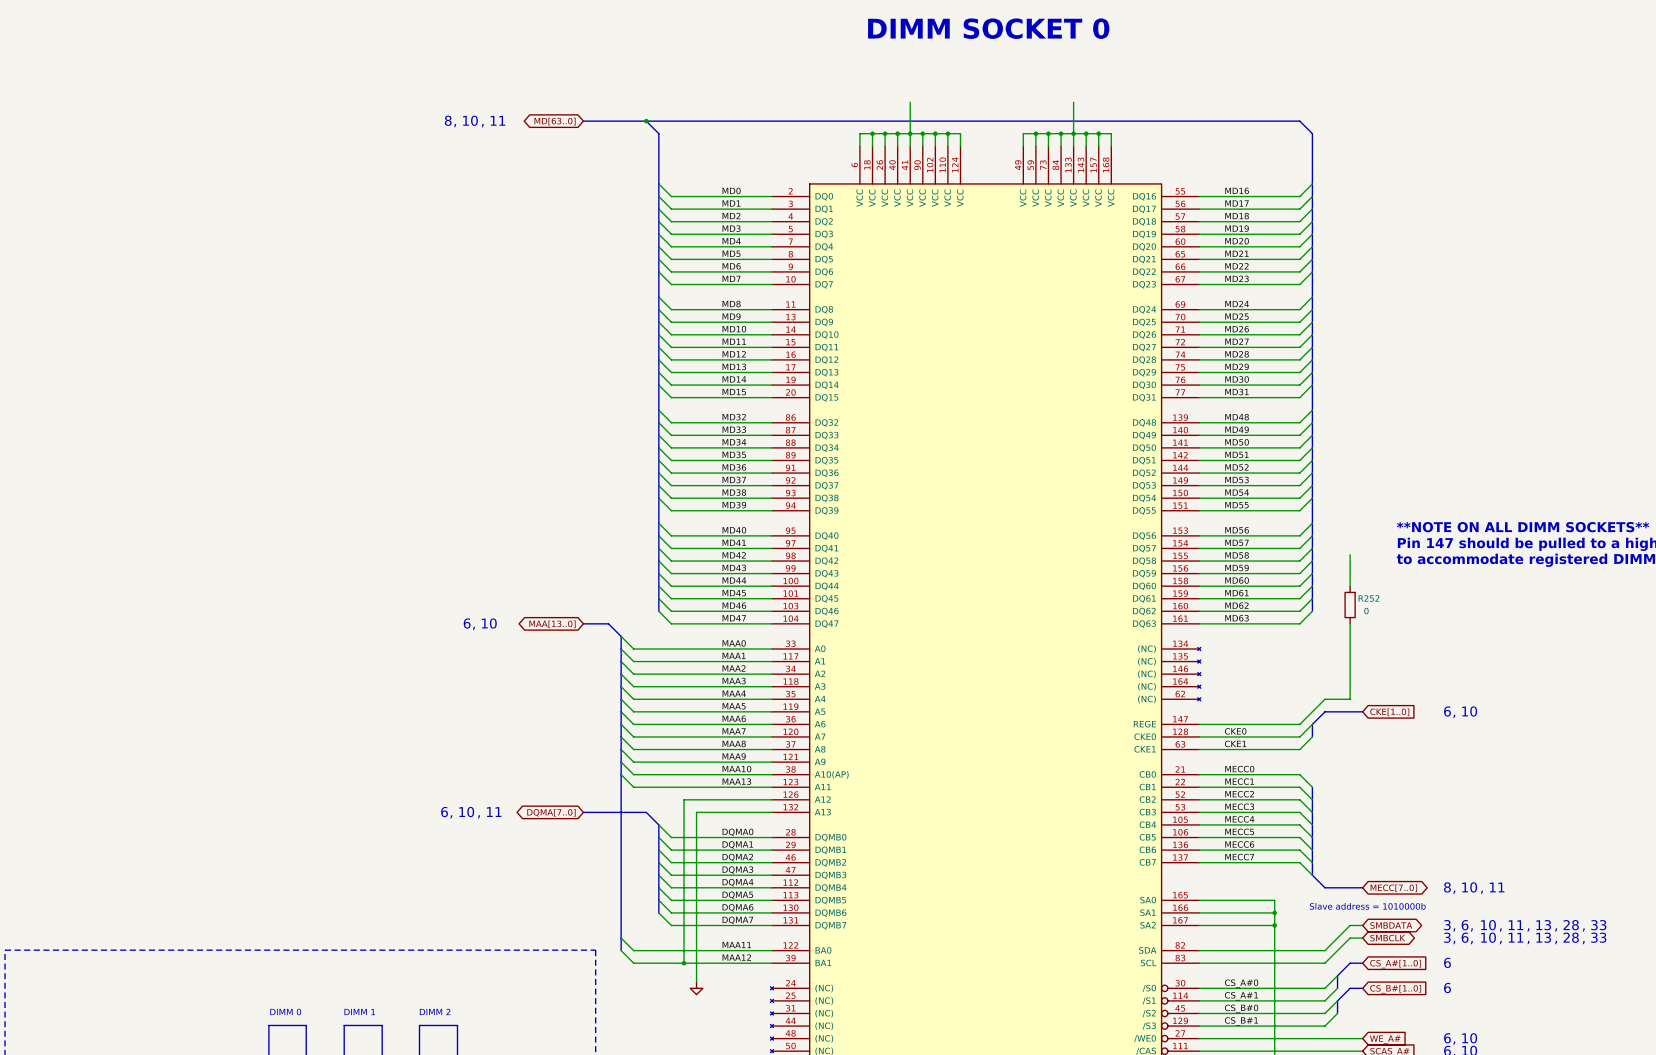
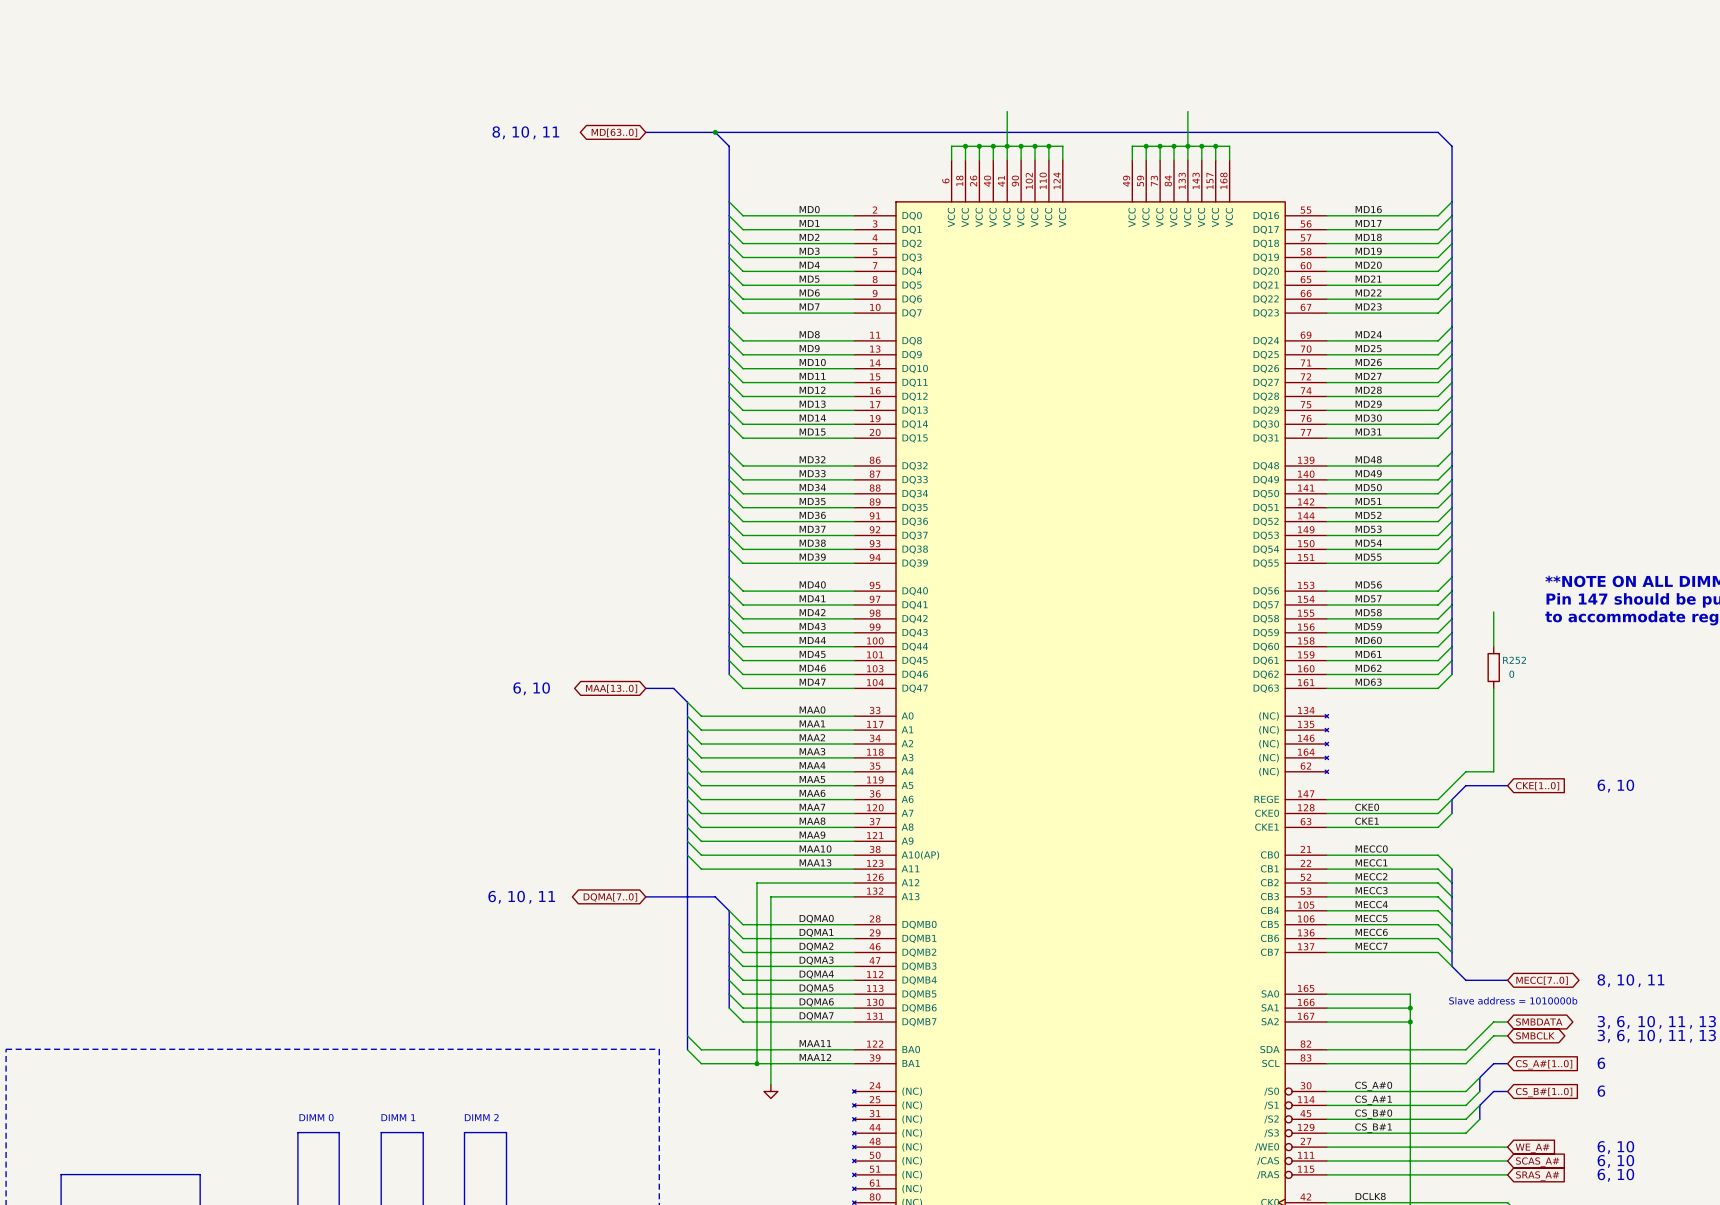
text: DIMM SOCKET 0 (988, 28) -> none

